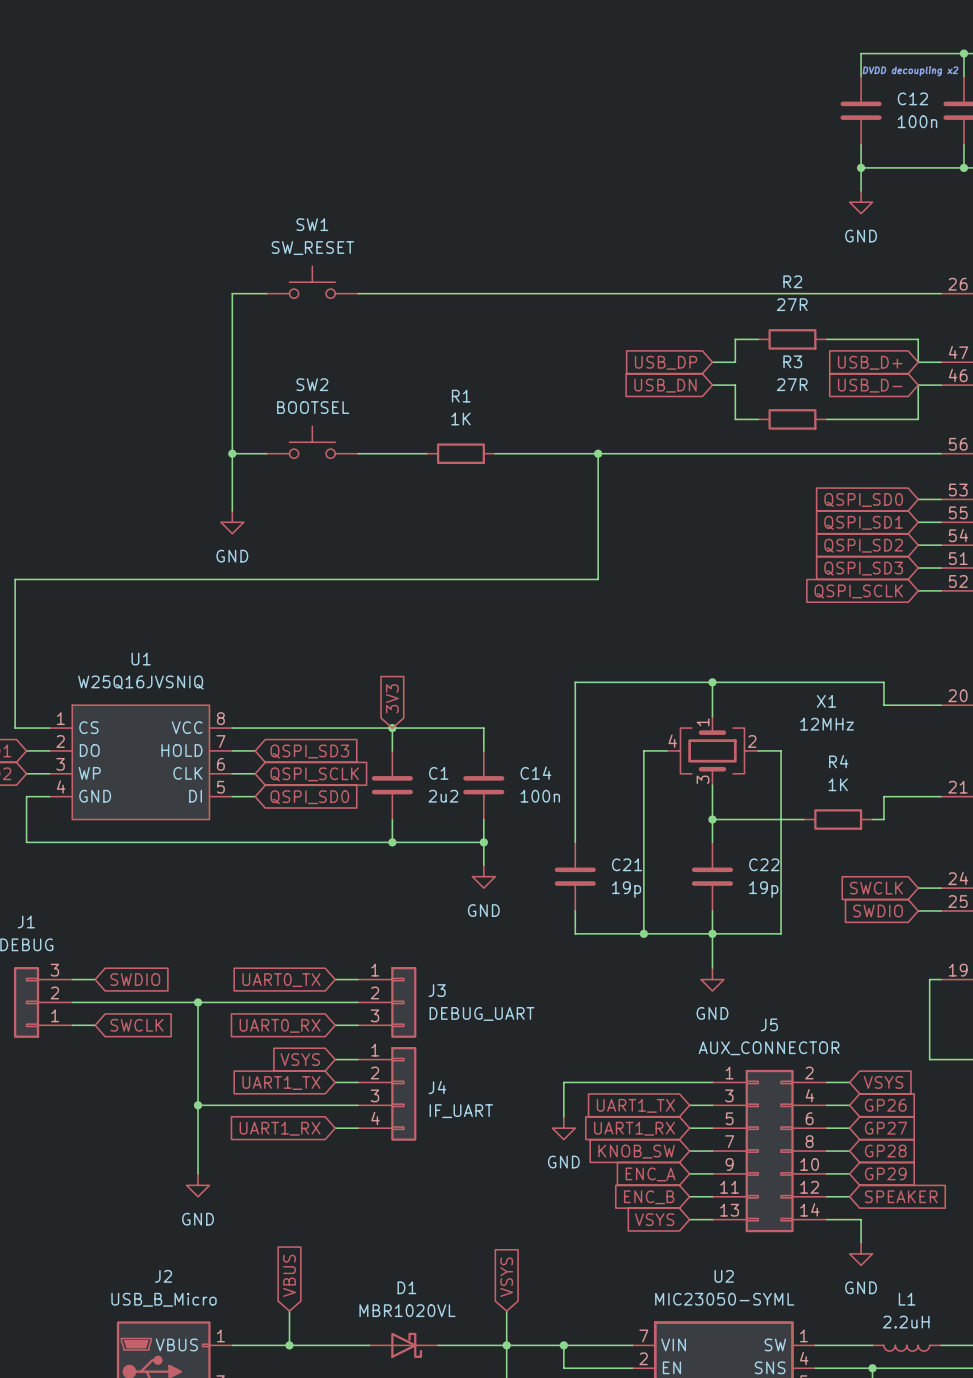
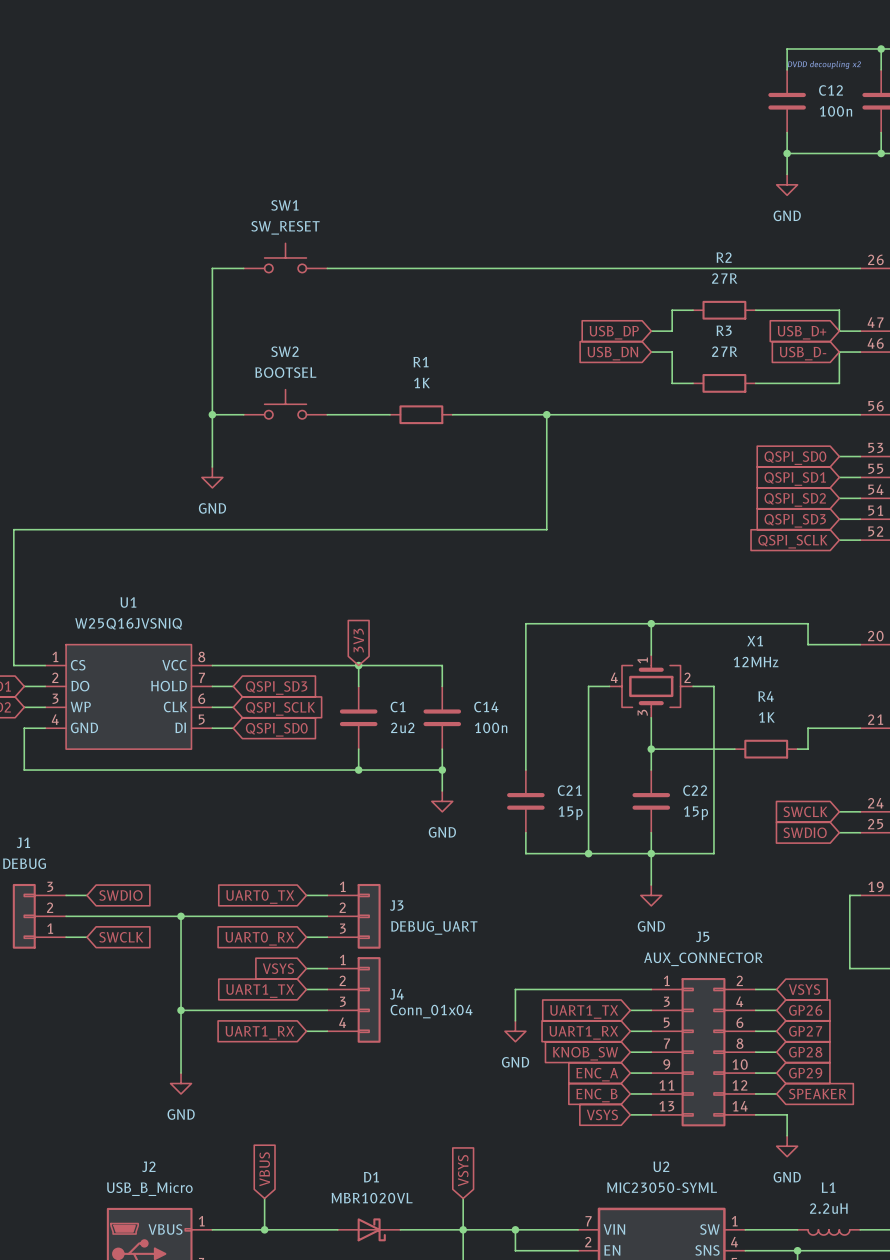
C21 value: 19p (626, 889) -> 15p (570, 813)
C22 value: 19p (763, 889) -> 15p (696, 813)
J4 value: IF_UART (461, 1111) -> Conn_01x04 (431, 1011)

